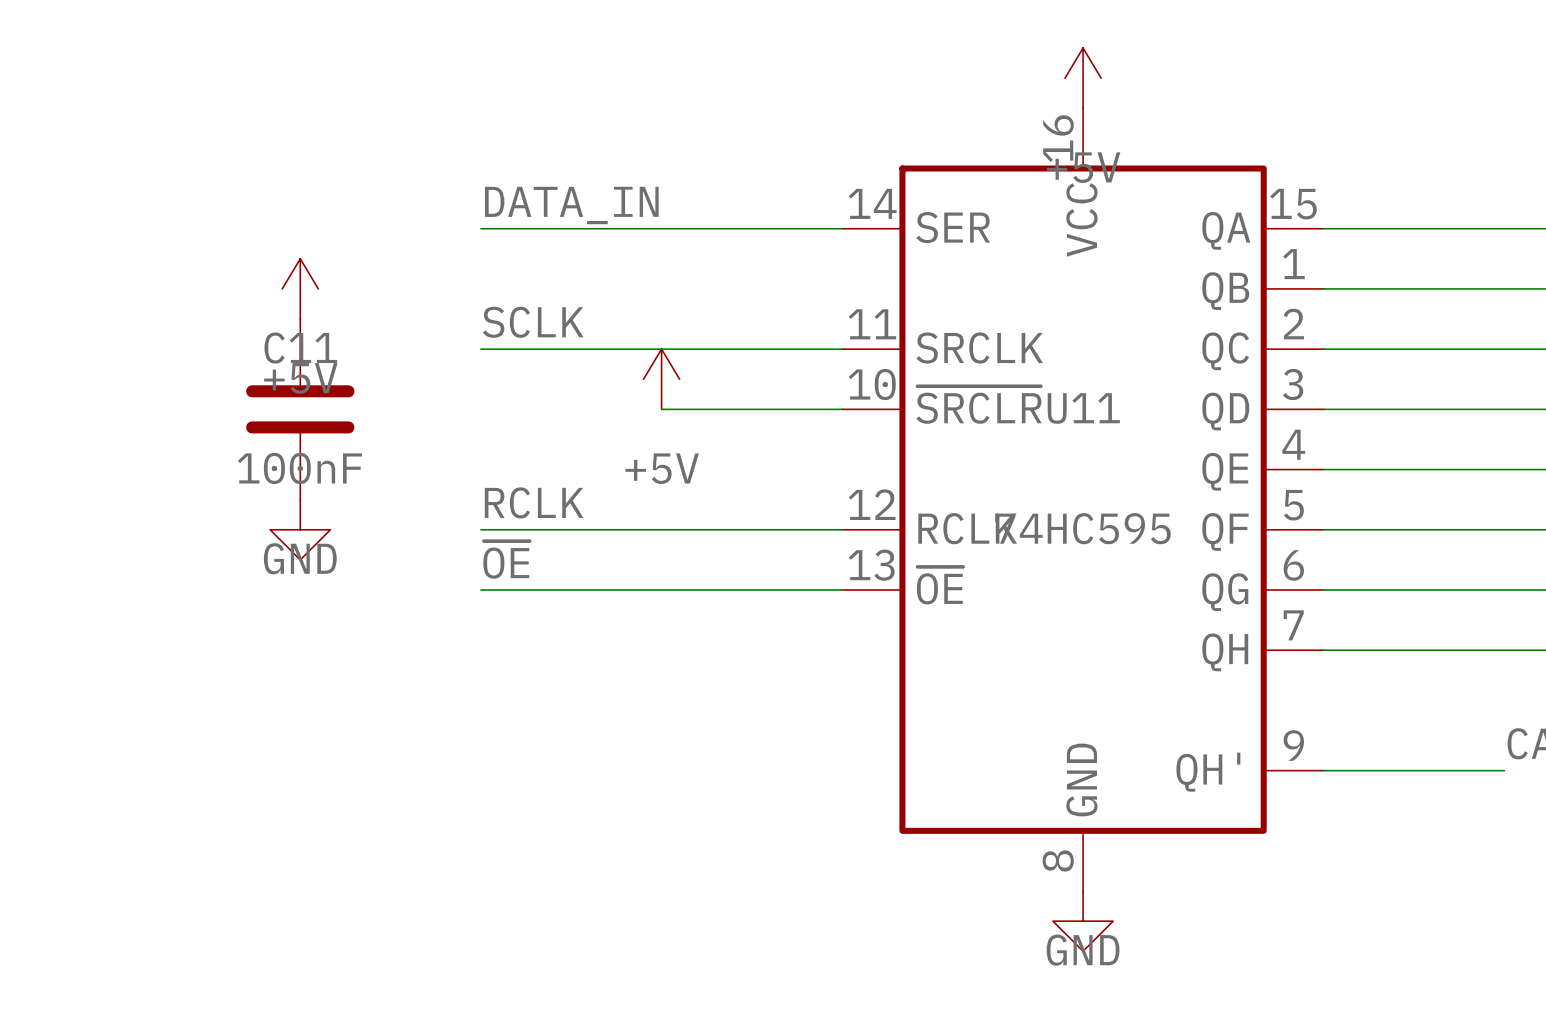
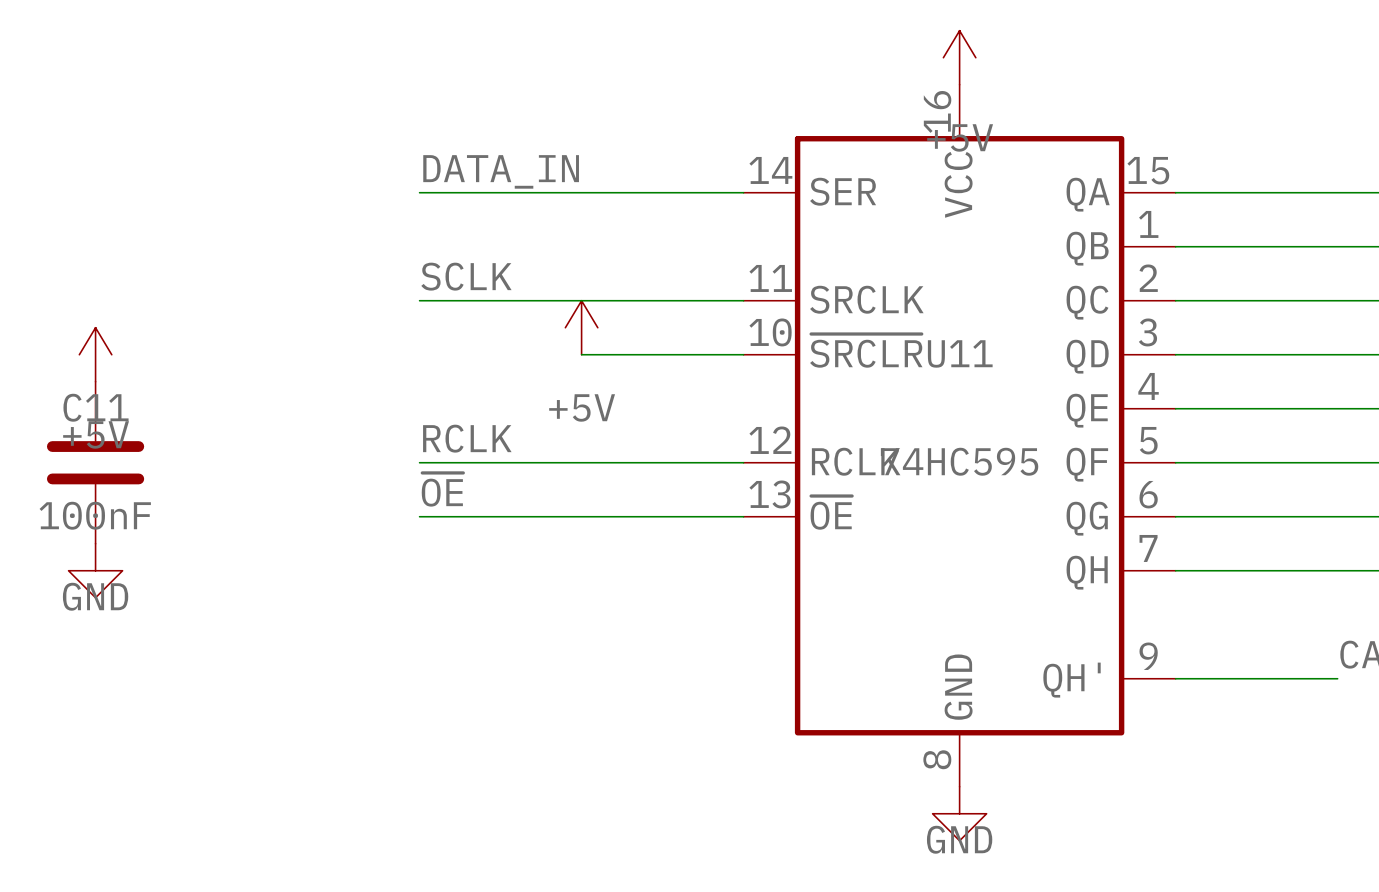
power symbol position: +5V (300, 288) -> +5V (95, 354)
C11 position: (300, 409) -> (95, 462)
power symbol position: GND (300, 529) -> GND (95, 570)

